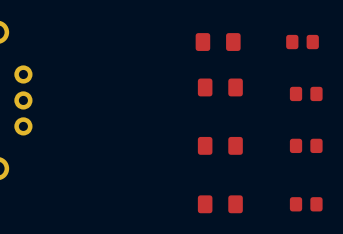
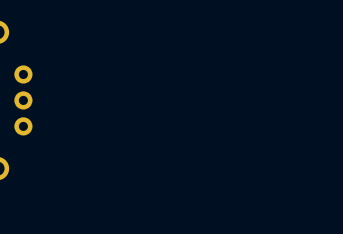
part: (218, 42) -> none
part: (302, 42) -> none
part: (220, 87) -> none
part: (306, 93) -> none
part: (220, 145) -> none
part: (306, 145) -> none
part: (220, 204) -> none
part: (306, 204) -> none

